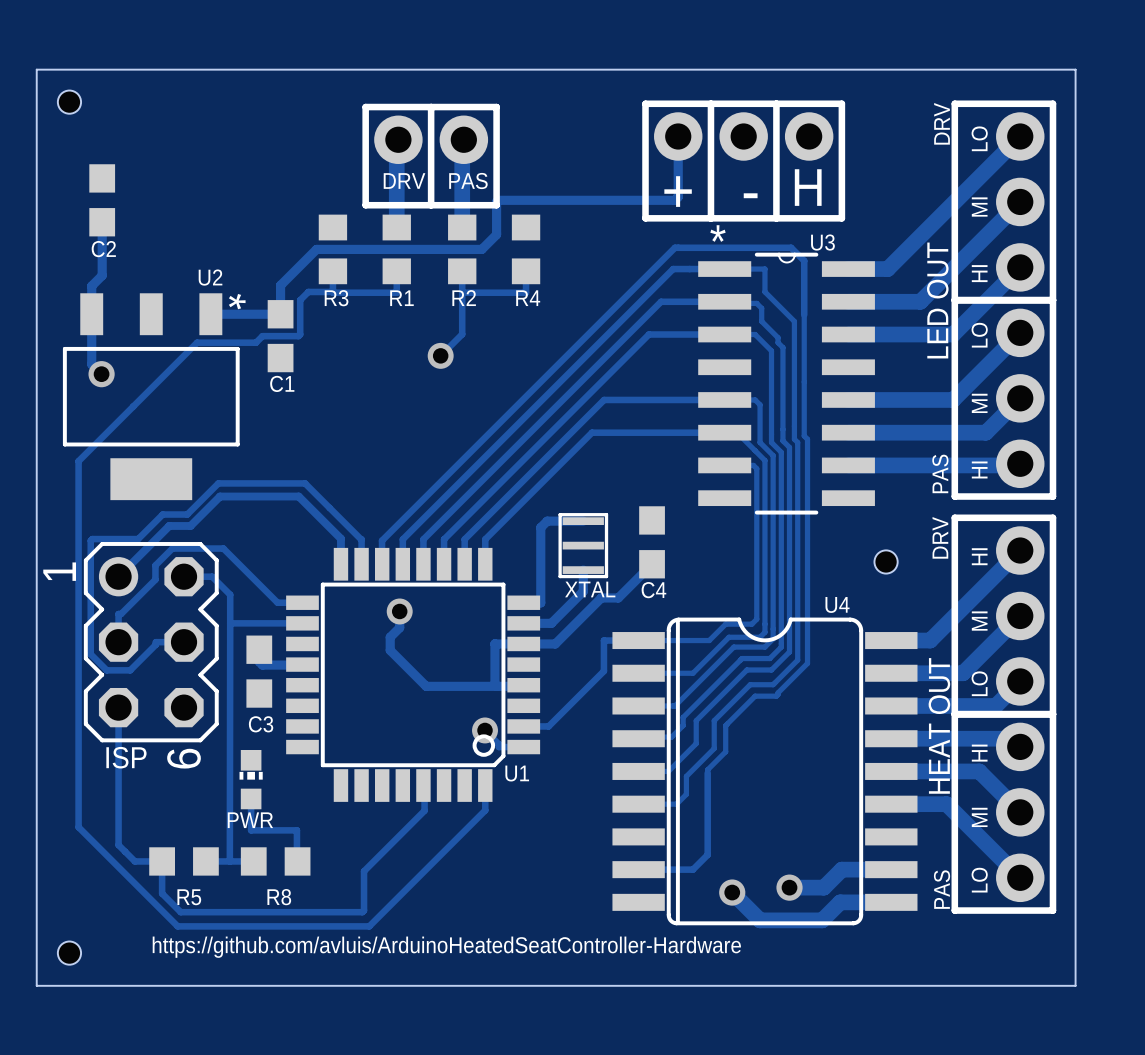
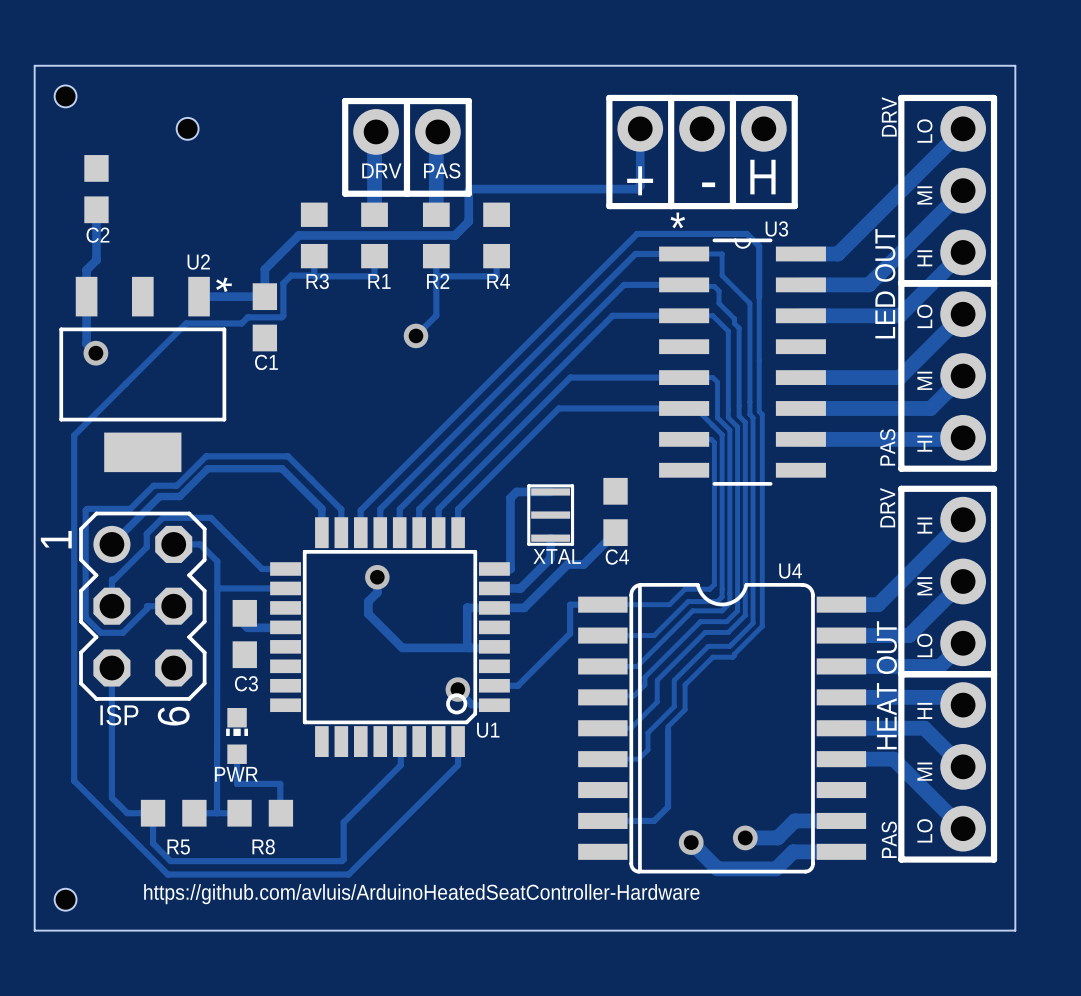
hole: none -> (187, 128)
hole: (886, 561) -> none

